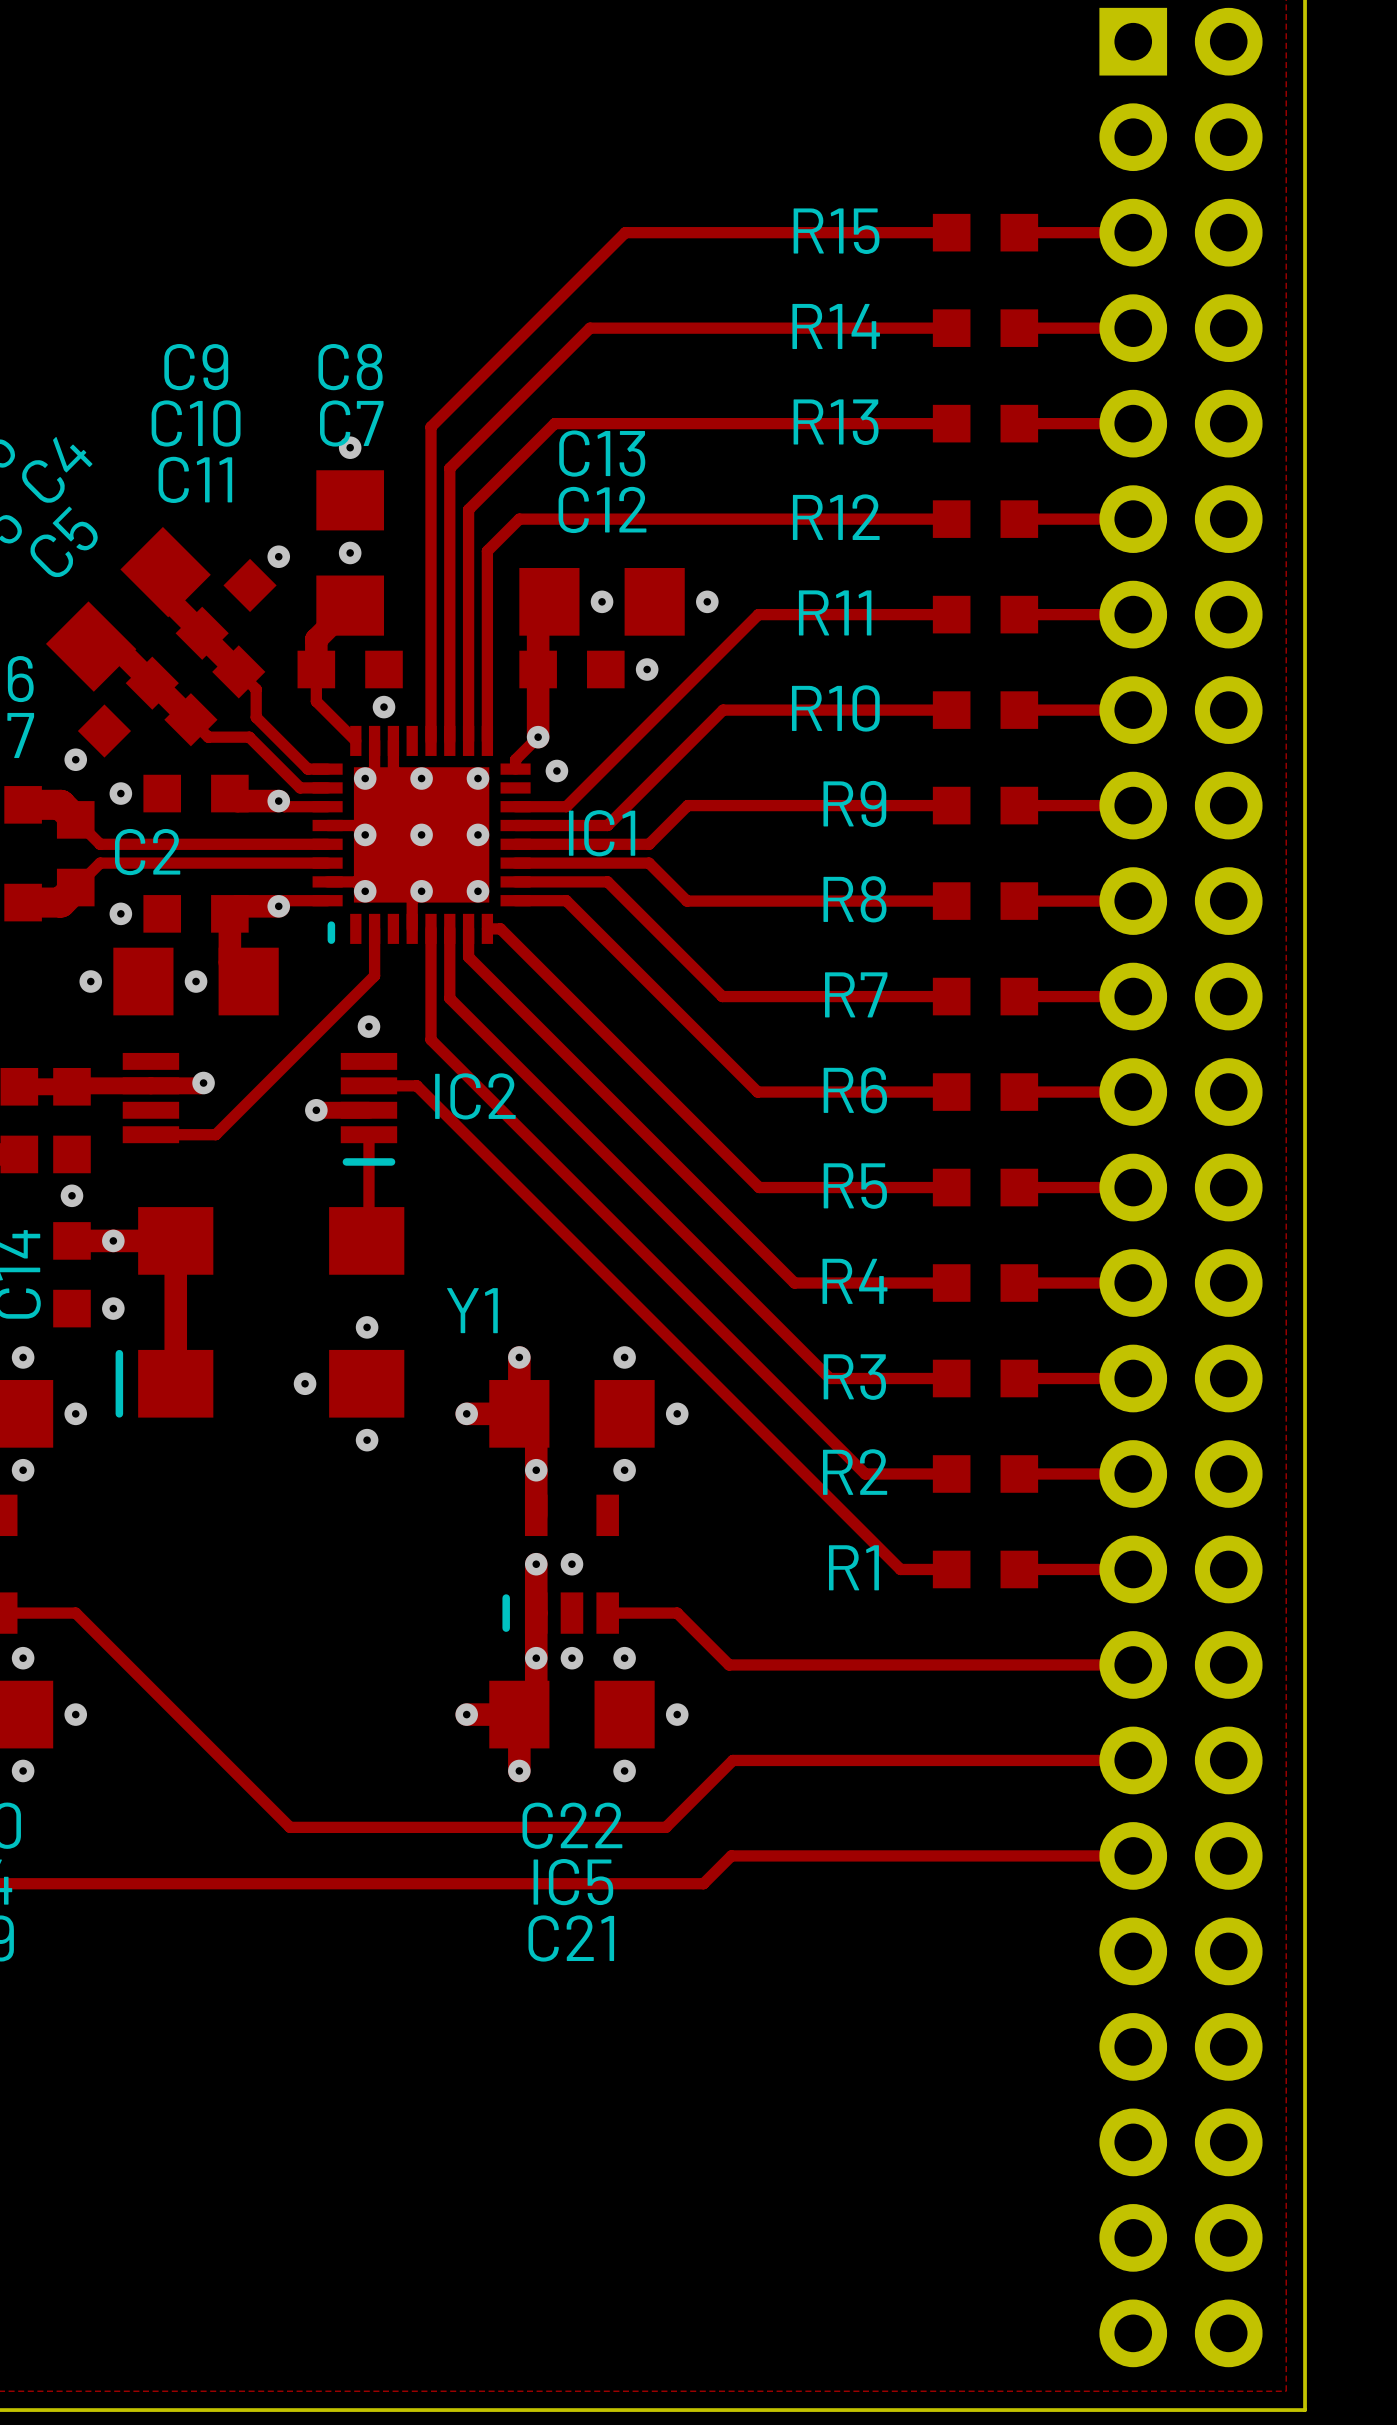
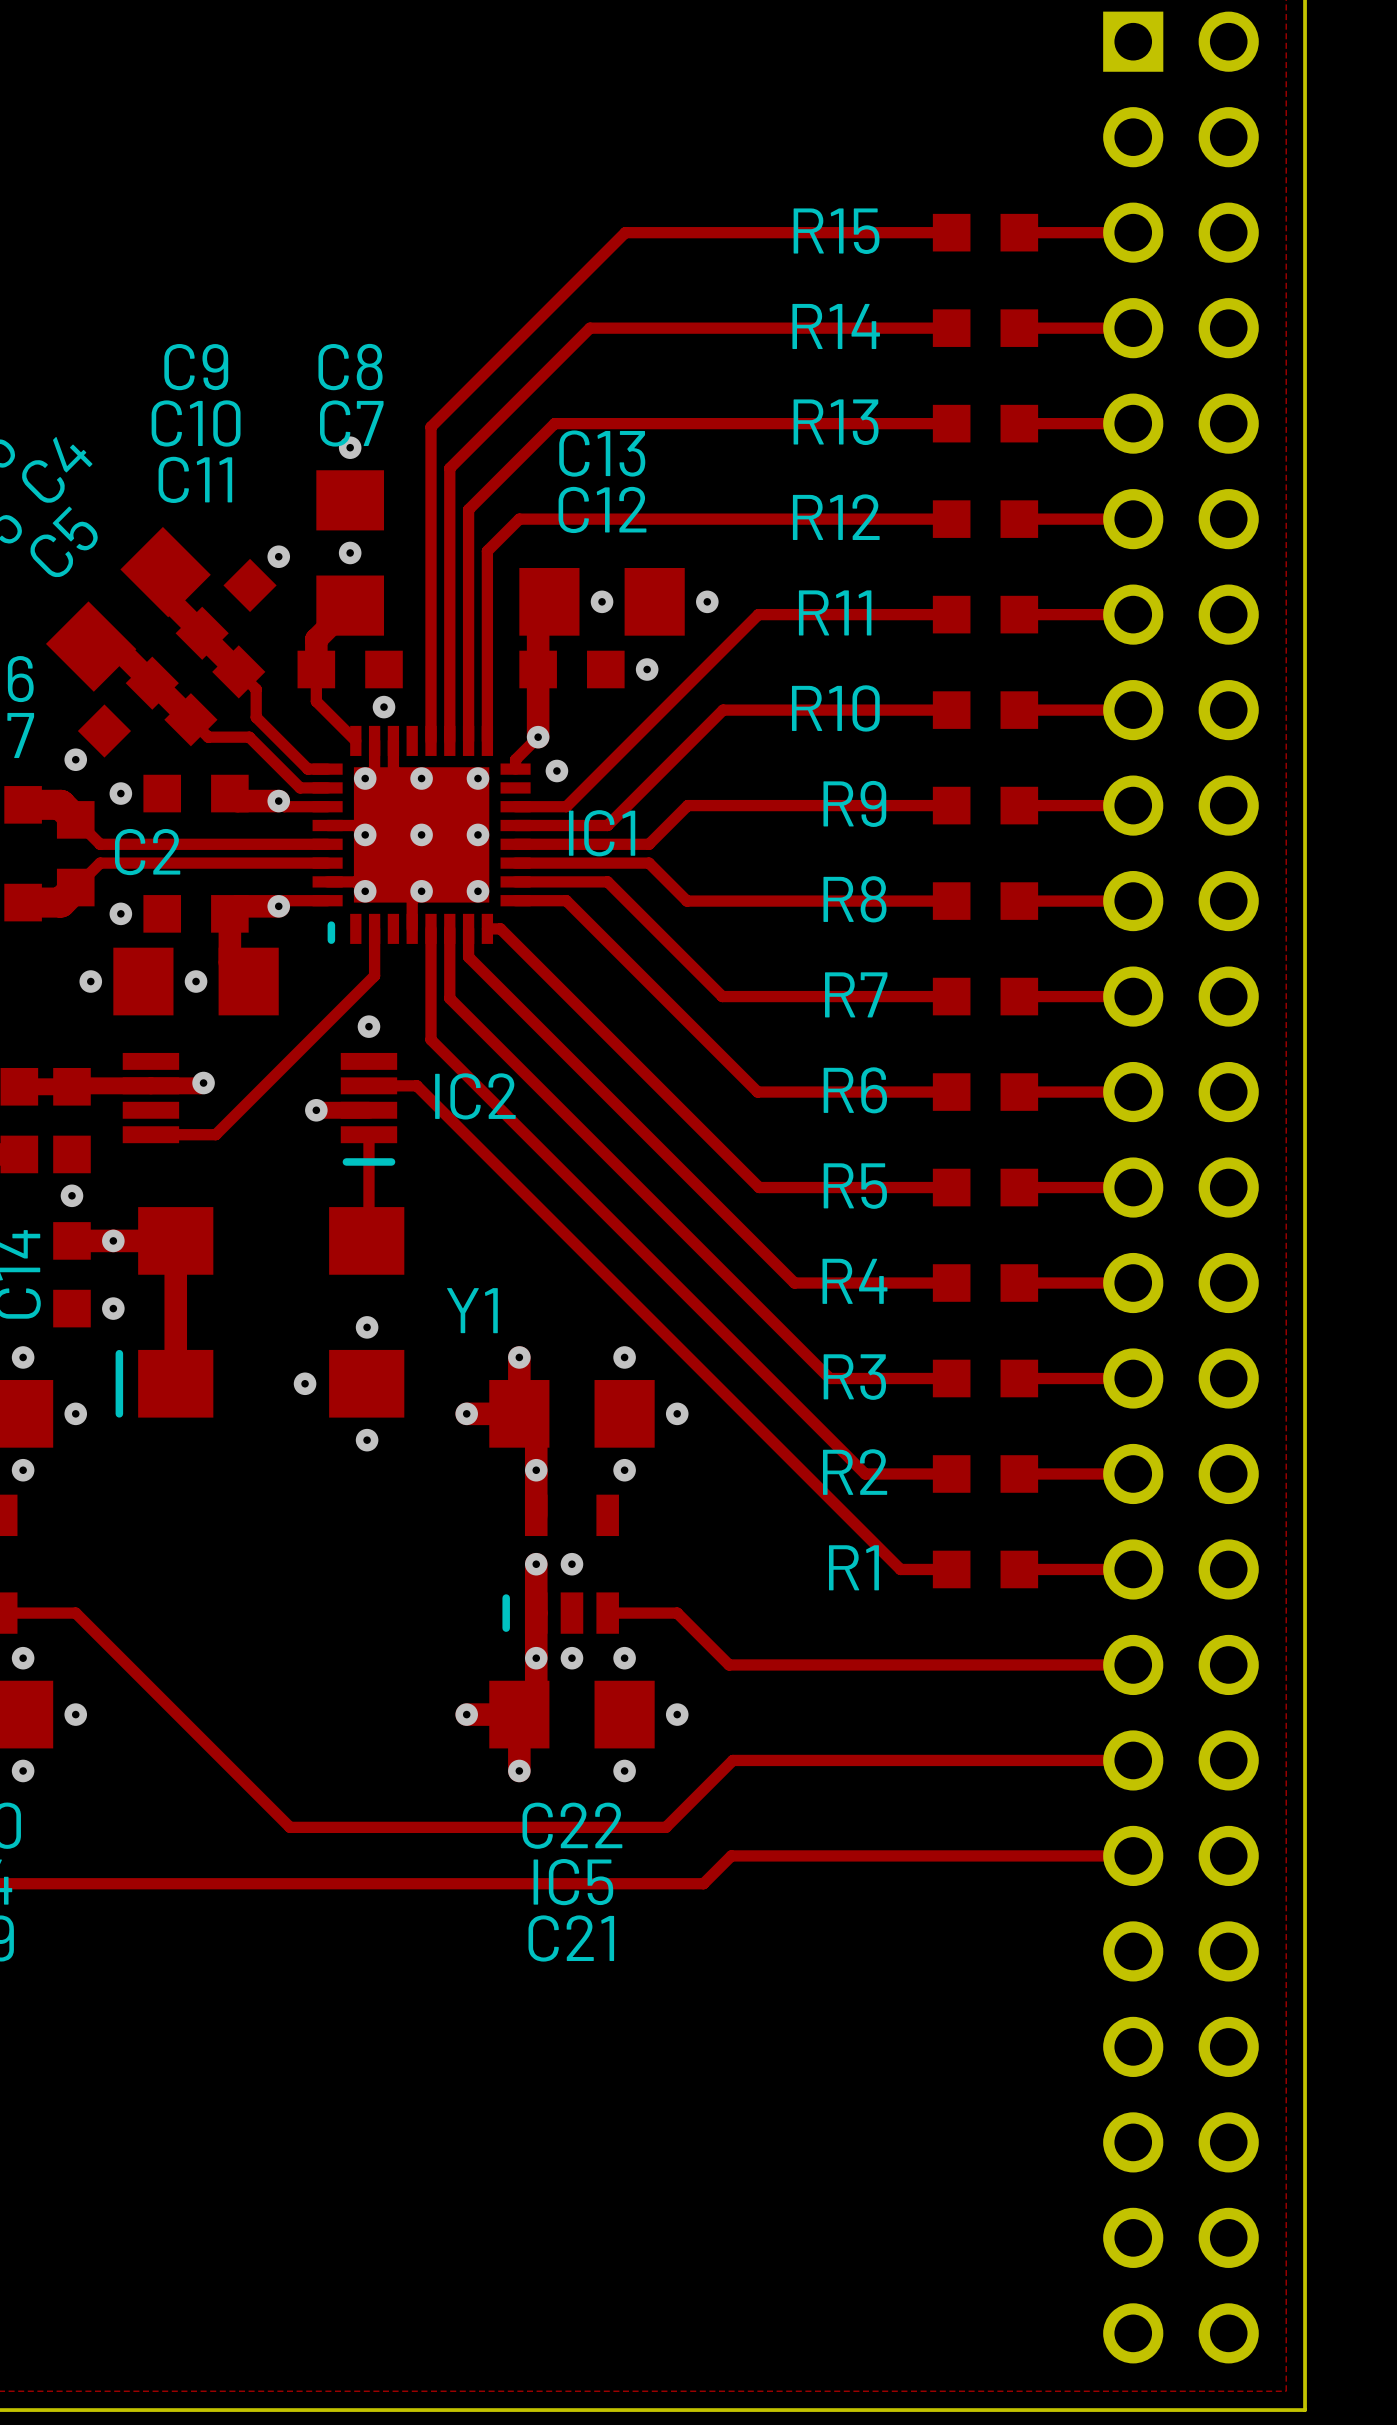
part footprint: [1099, 7, 1263, 2368] -> [1103, 11, 1259, 2364]

